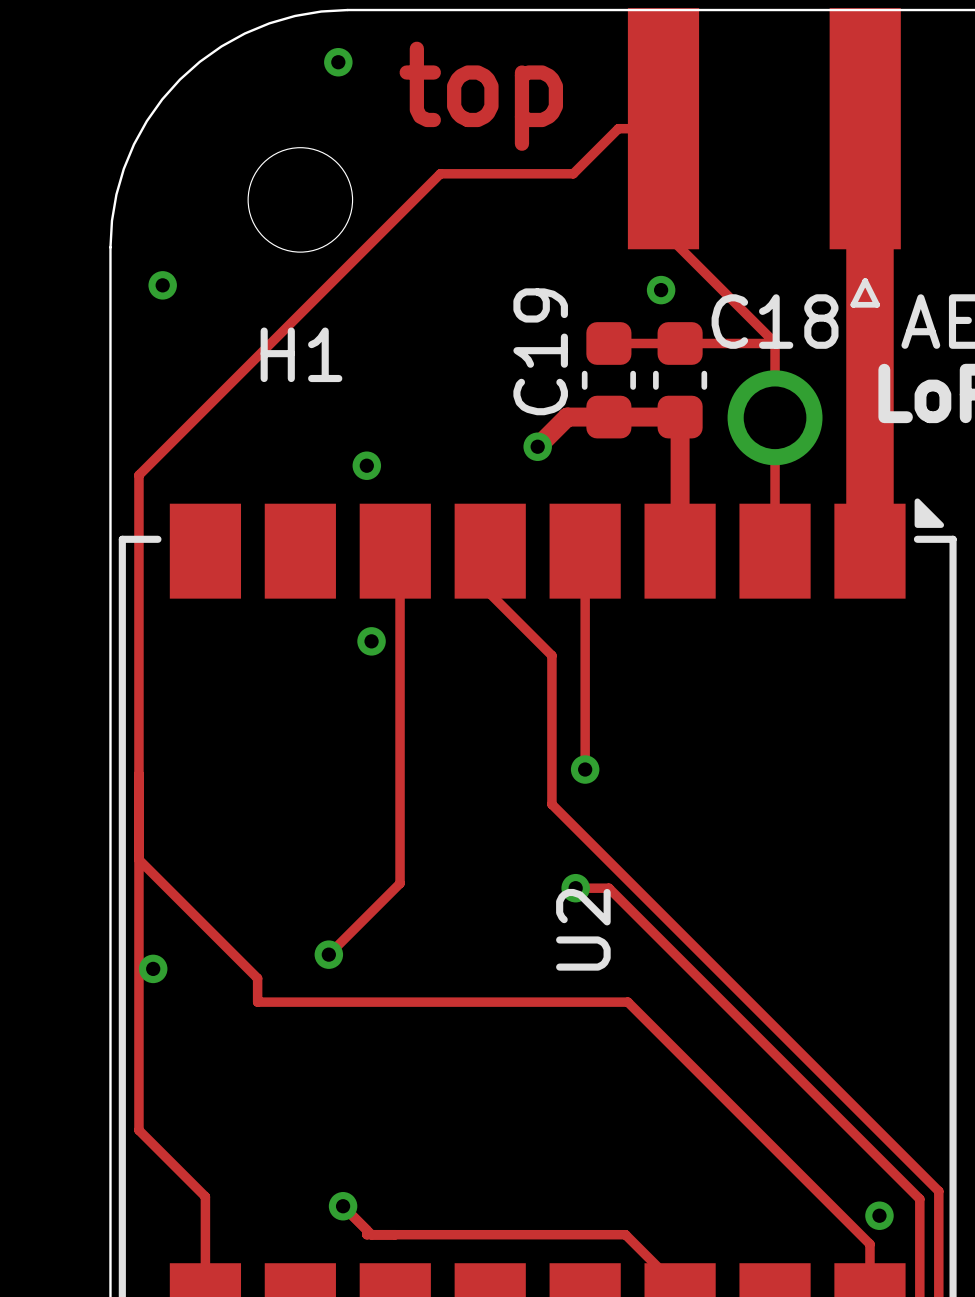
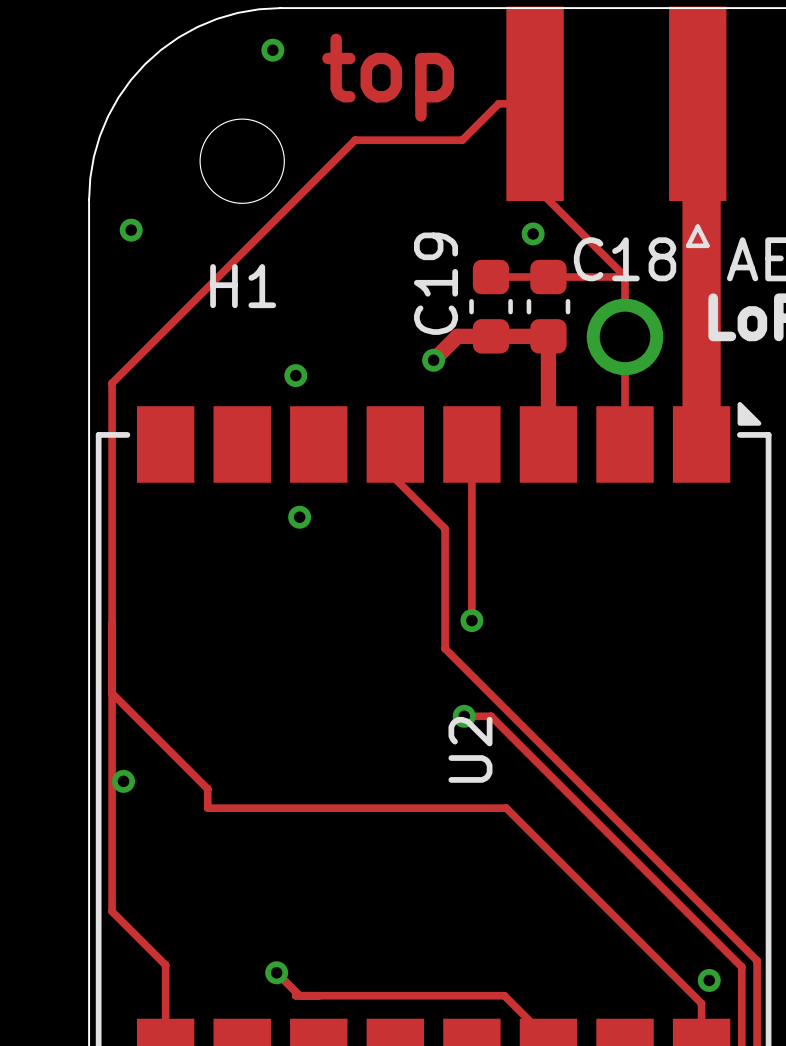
track: (395, 551) (400, 555) (400, 883) (328, 954) -> none
via: (328, 954) -> none

